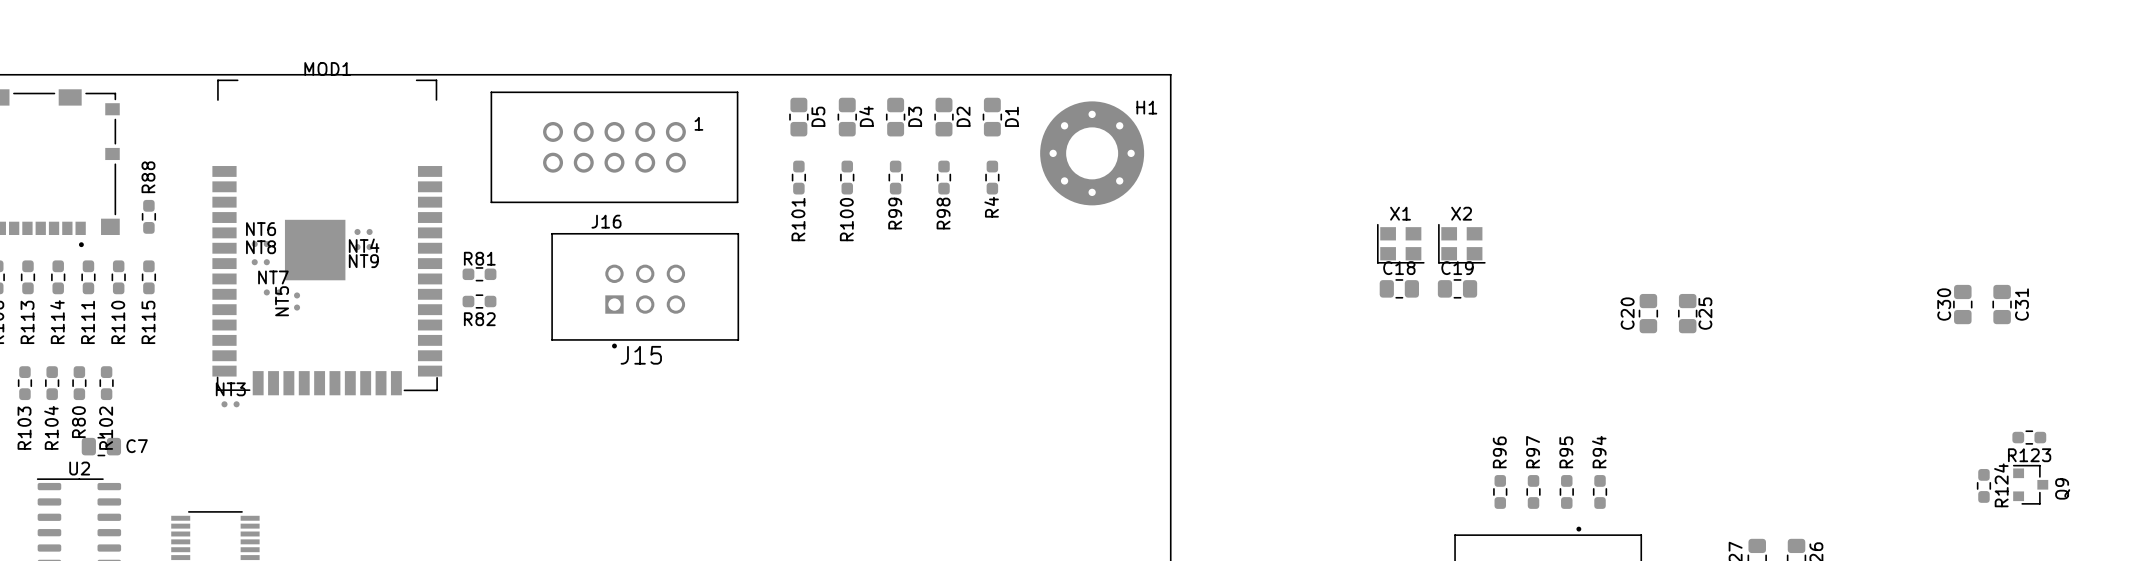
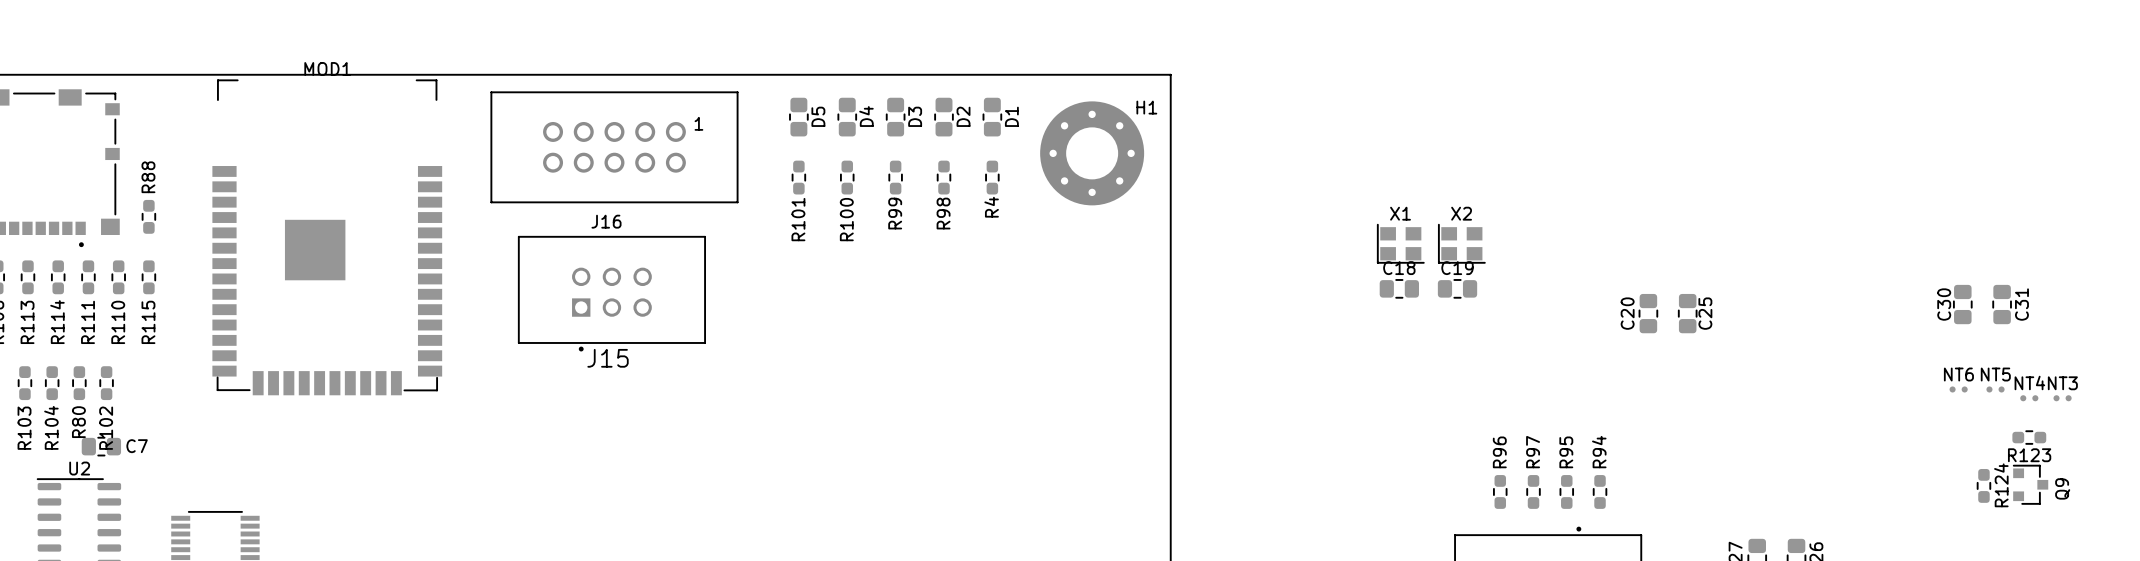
NT4 position: (363, 231) -> (2029, 398)
NT6 position: (260, 244) -> (1958, 389)
NT4 name position: NT4 (364, 245) -> NT4 (2029, 383)
NT9: (363, 247) -> none
NT8: (260, 262) -> none
R81: (479, 274) -> none
J15 position: (645, 290) -> (611, 293)
NT7: (272, 292) -> none
NT5 rotation: 0° (297, 301) -> 90° clockwise (1995, 389)
NT5 position: (297, 301) -> (1995, 389)
R82: (479, 301) -> none
NT3 position: (230, 404) -> (2062, 398)

